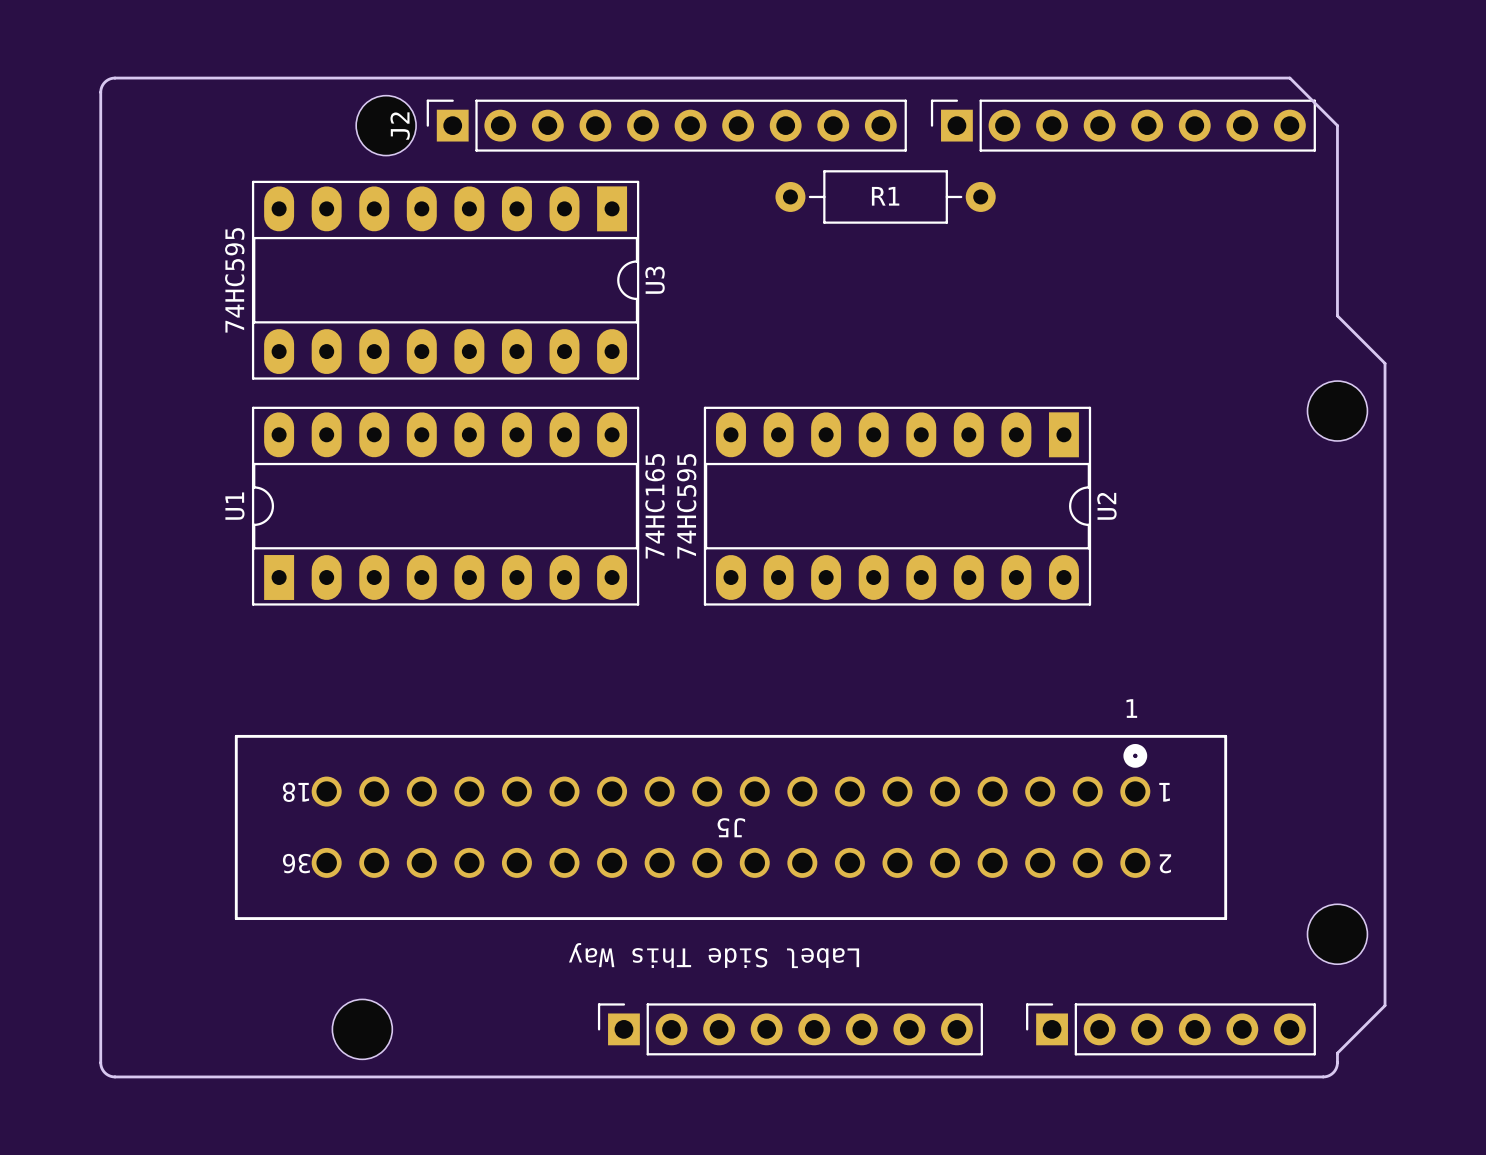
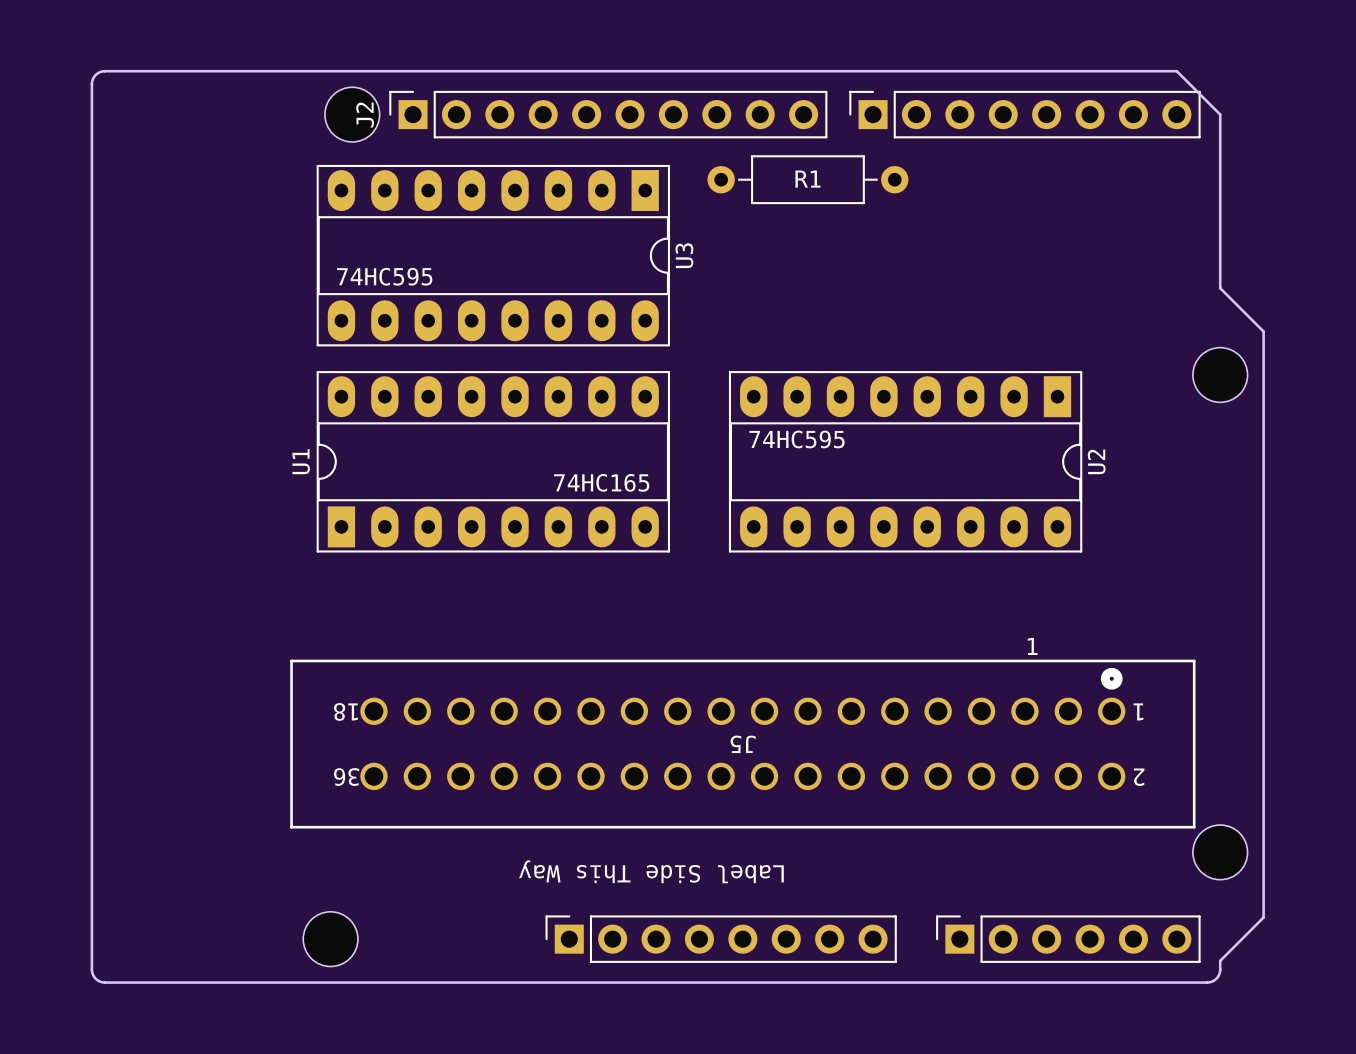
U3 value rotation: 0° (234, 280) -> 90° clockwise (384, 276)
U3 position: (445, 280) -> (493, 255)
U1 position: (445, 506) -> (493, 461)
U1 value rotation: 0° (655, 506) -> 90° clockwise (601, 482)
U2 value rotation: 0° (686, 506) -> 90° clockwise (796, 439)
U2 position: (897, 506) -> (905, 461)
J5 position: (730, 827) -> (742, 744)

